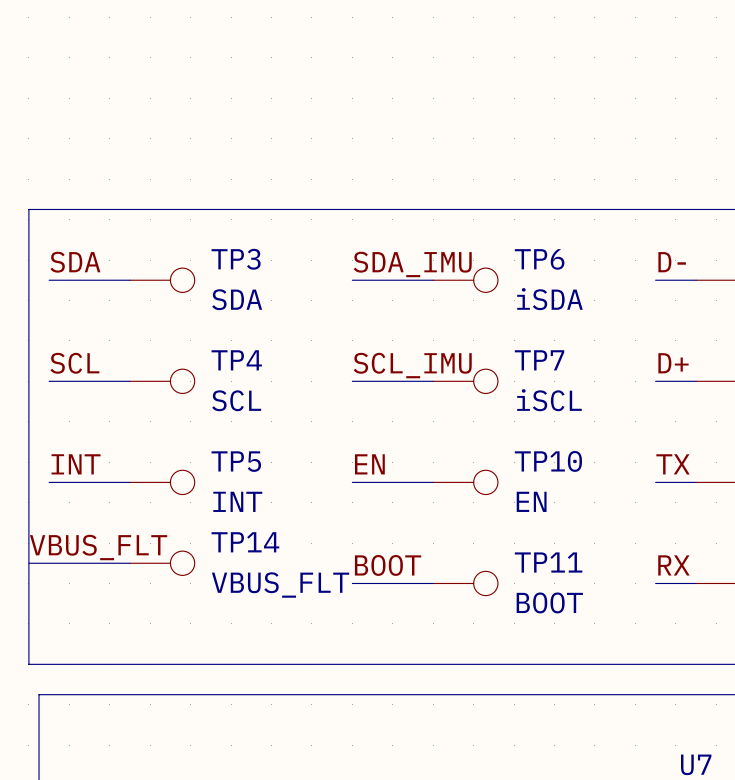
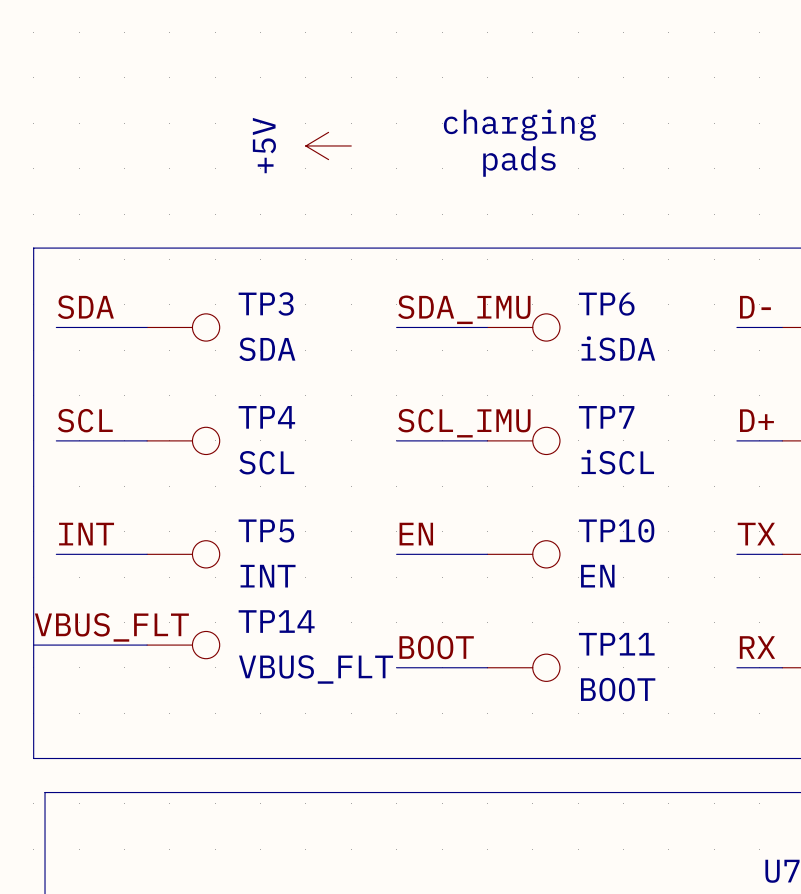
text: none -> charging (519, 125)
power symbol: none -> +5V (328, 145)
text: none -> pads (519, 161)

